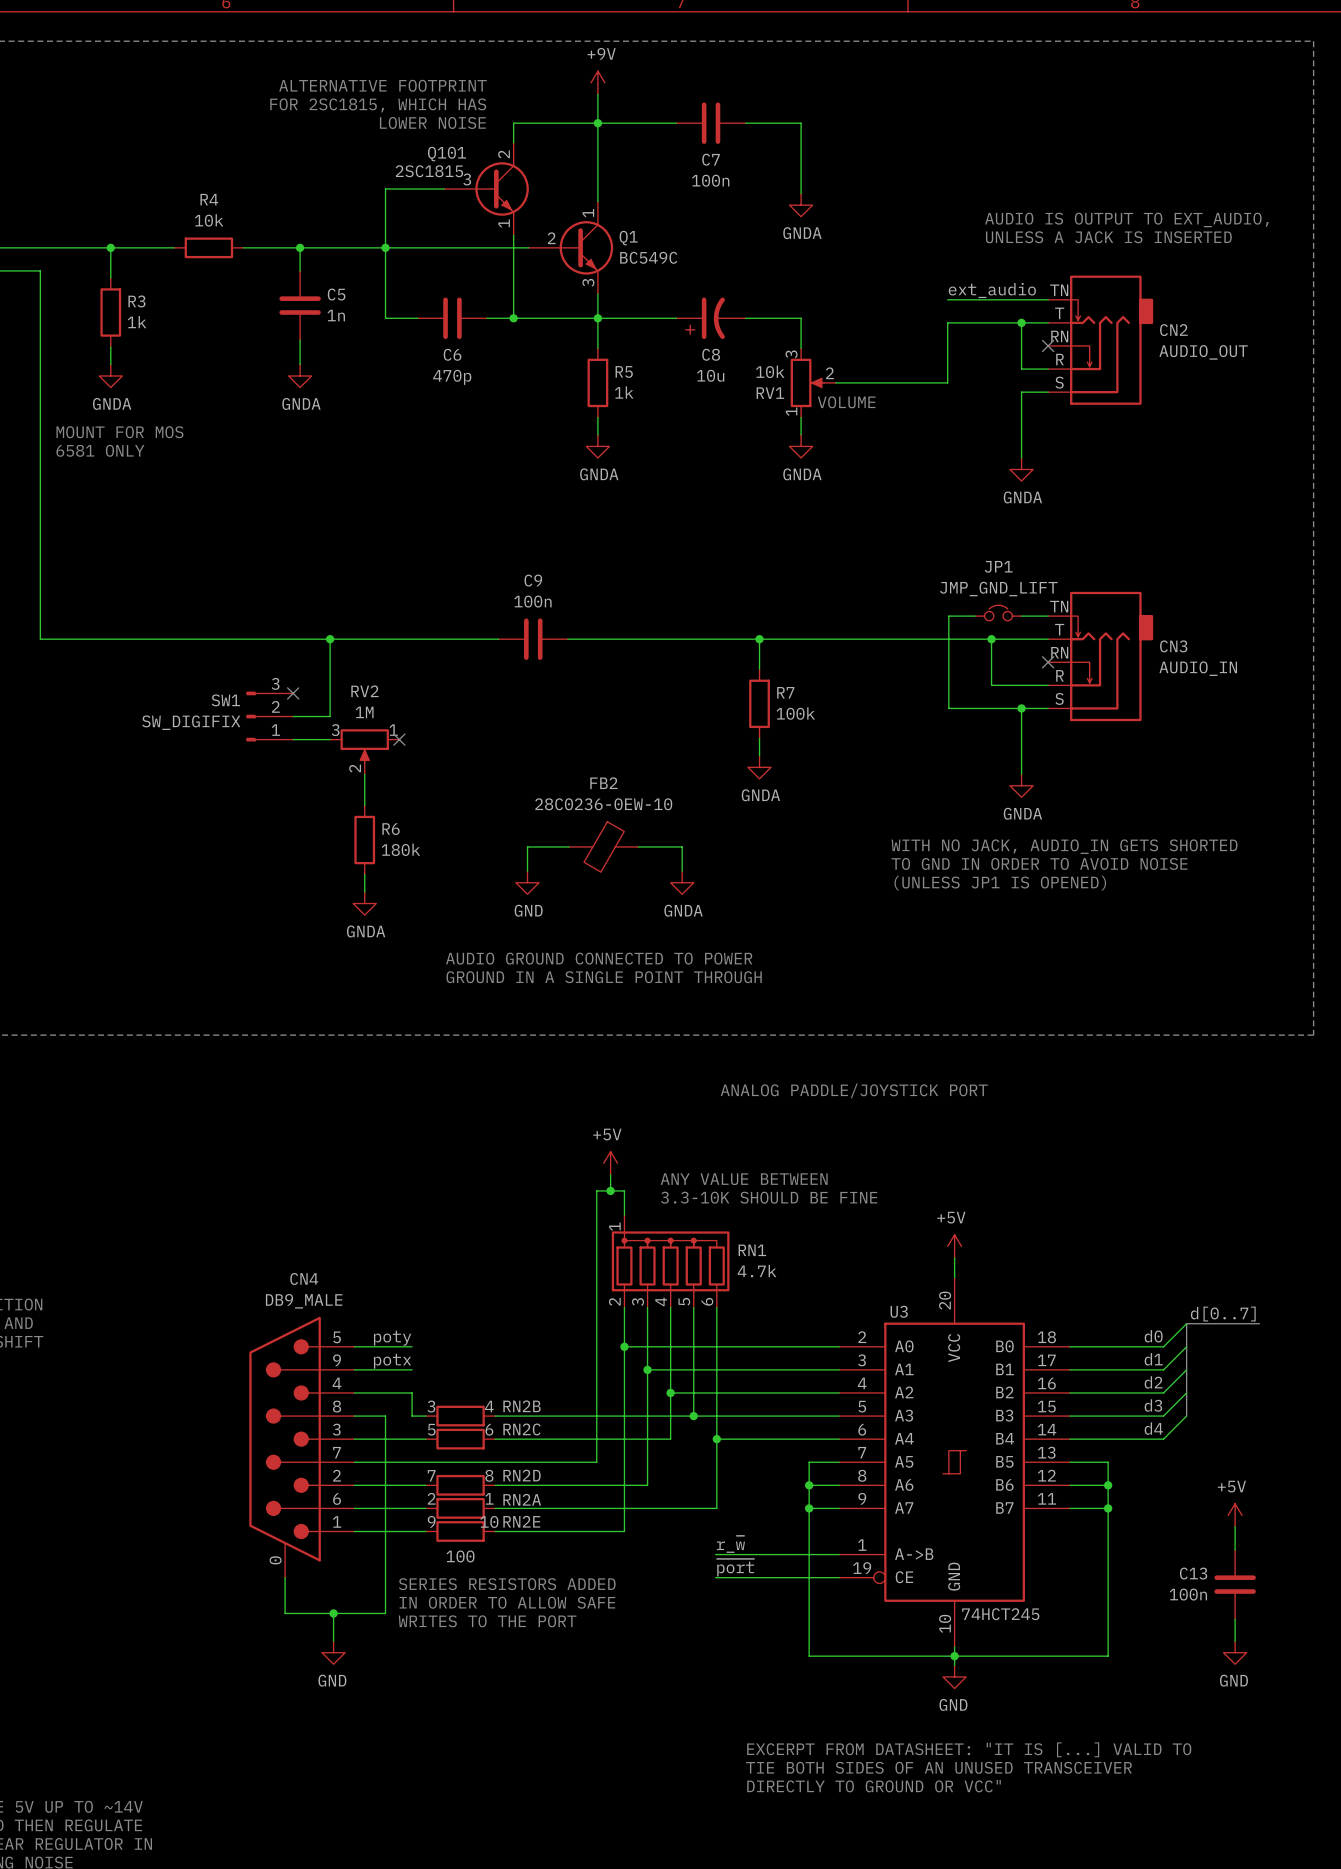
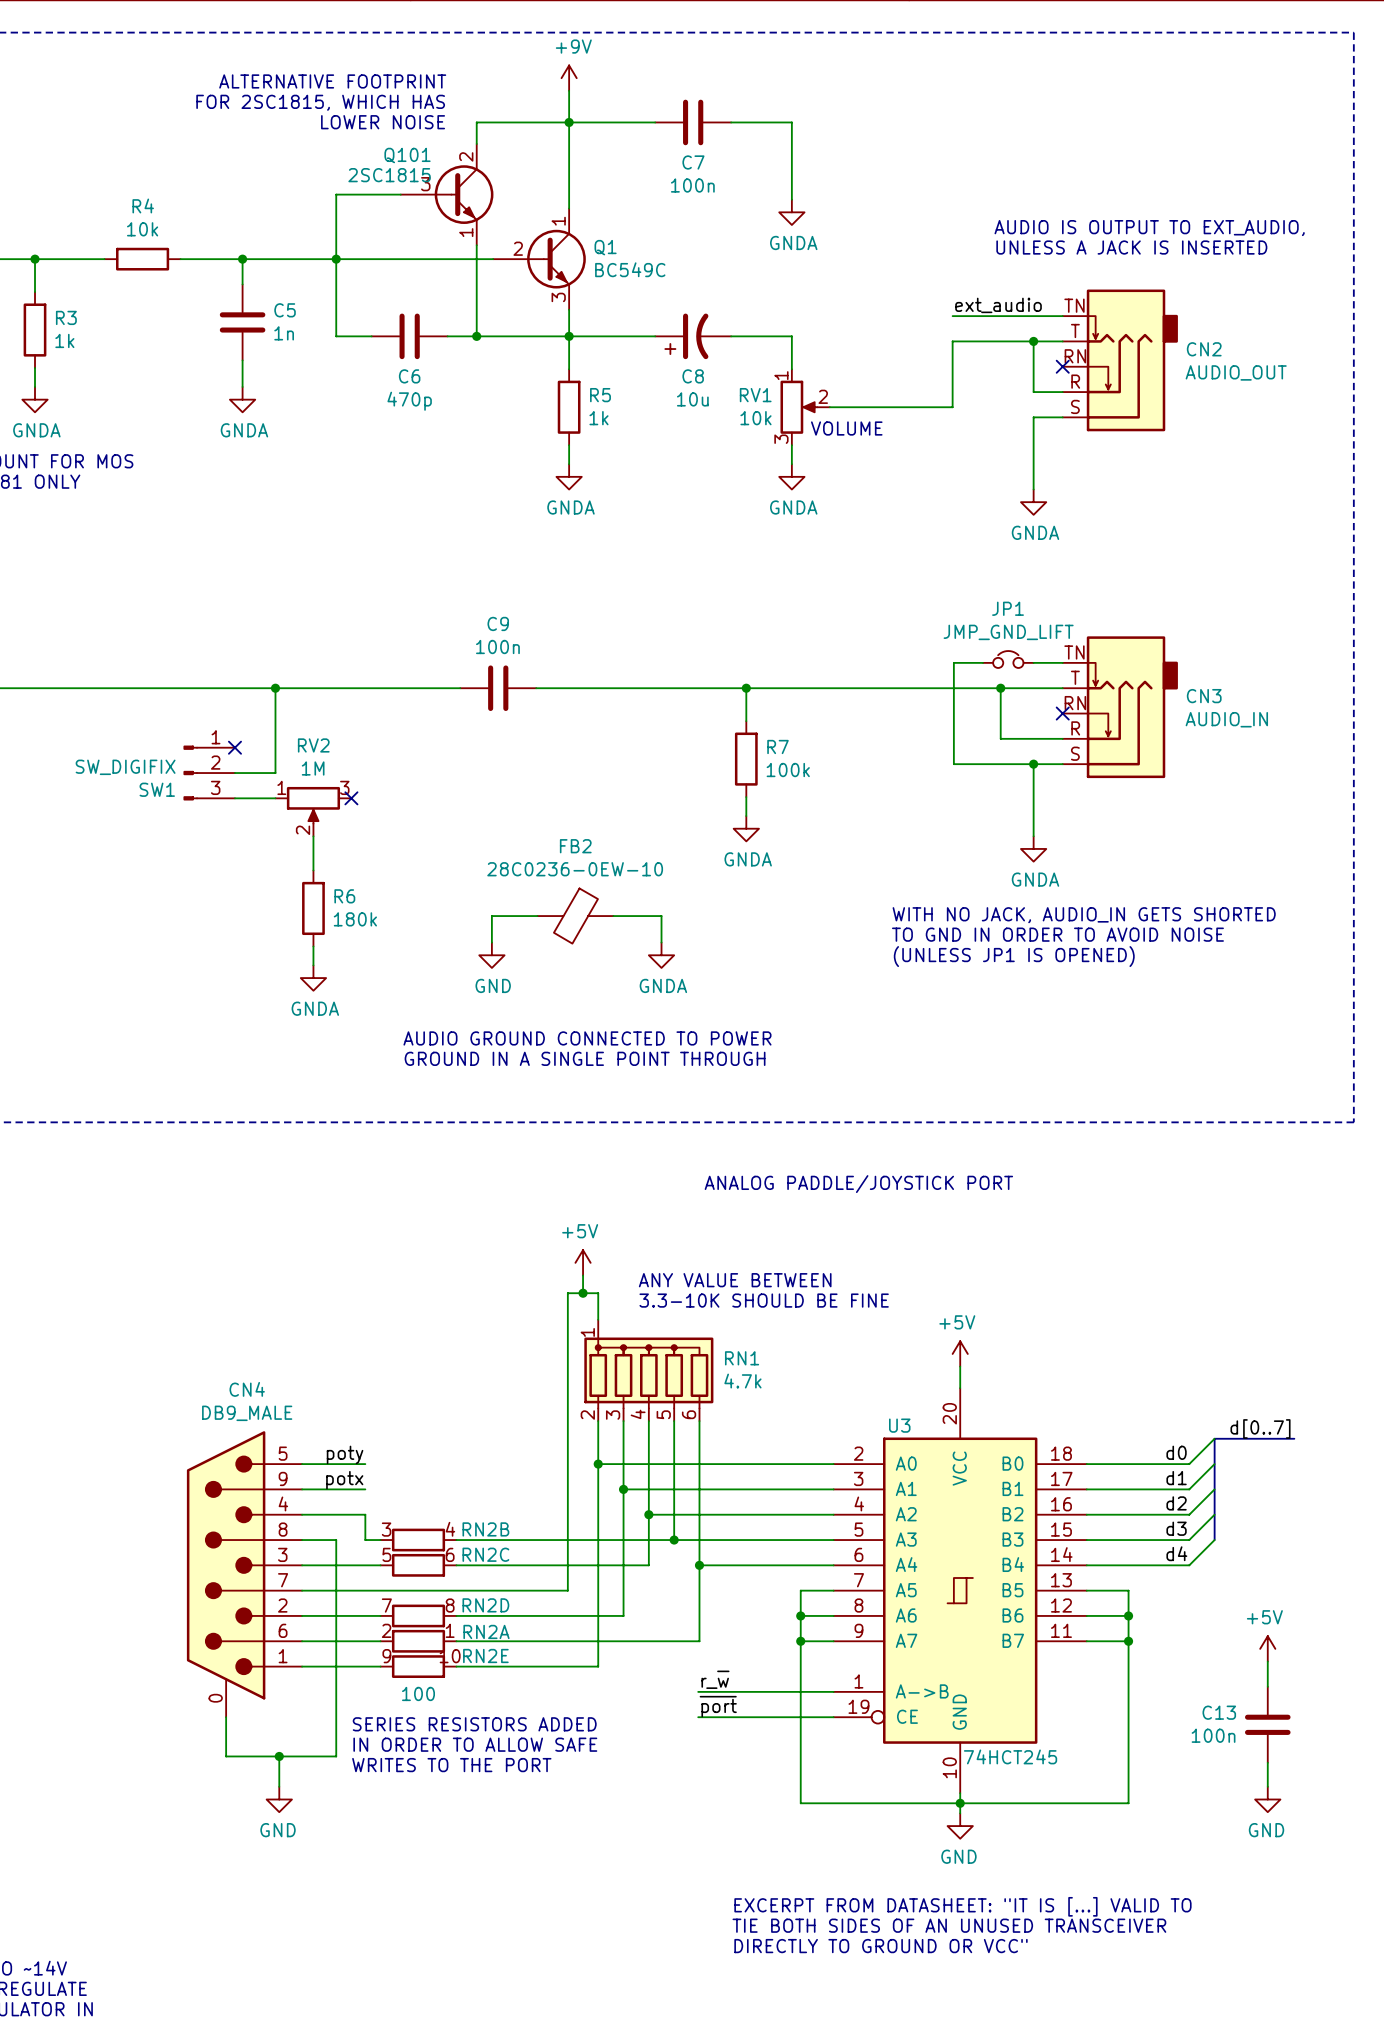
RV1 flip: as is (807, 382) -> up-down (798, 407)
SW1 flip: as is (252, 716) -> up-down (190, 773)
RV2 flip: as is (364, 745) -> left-right (313, 805)

